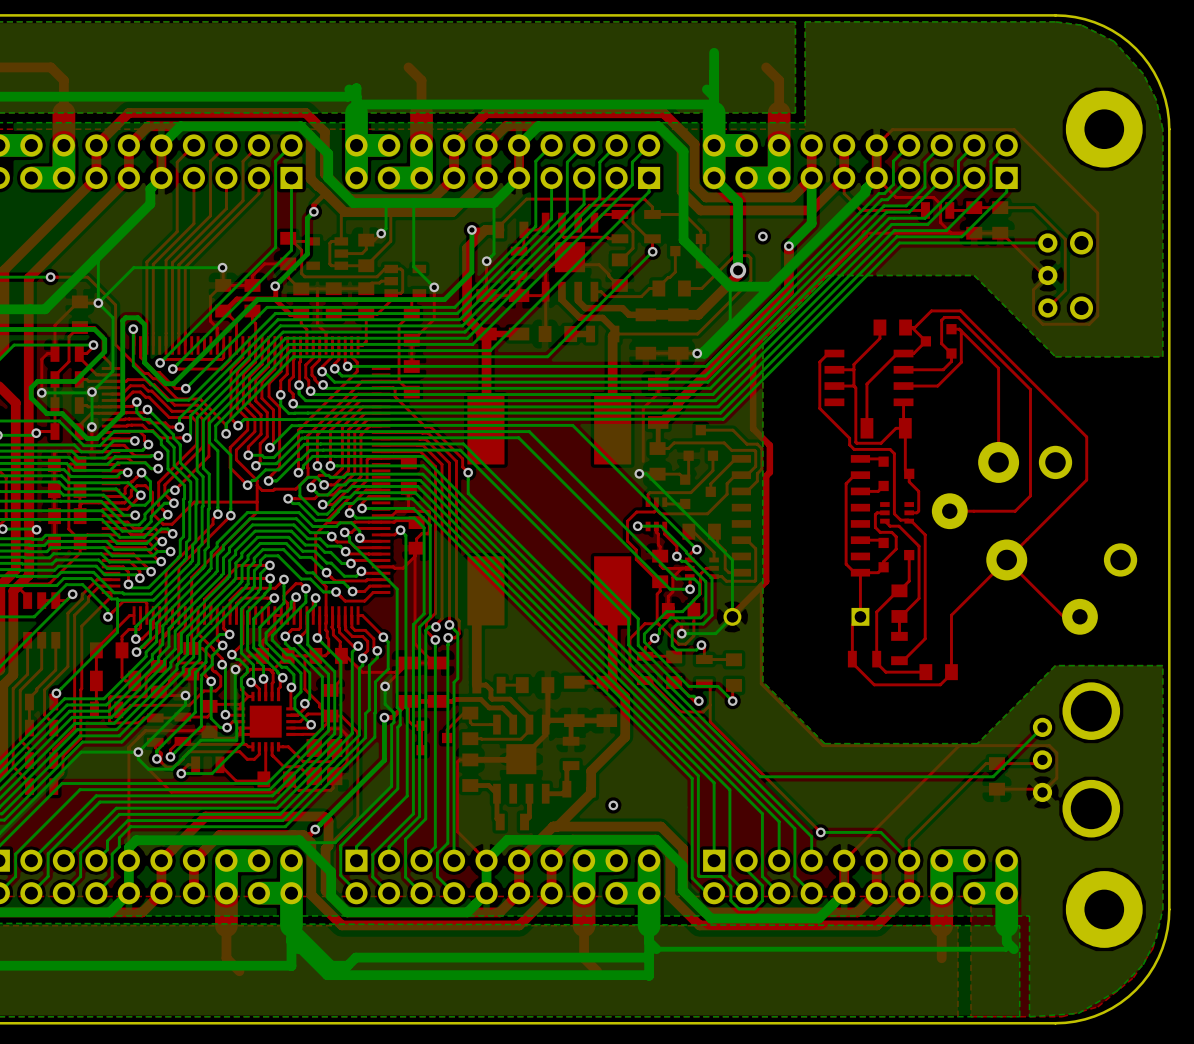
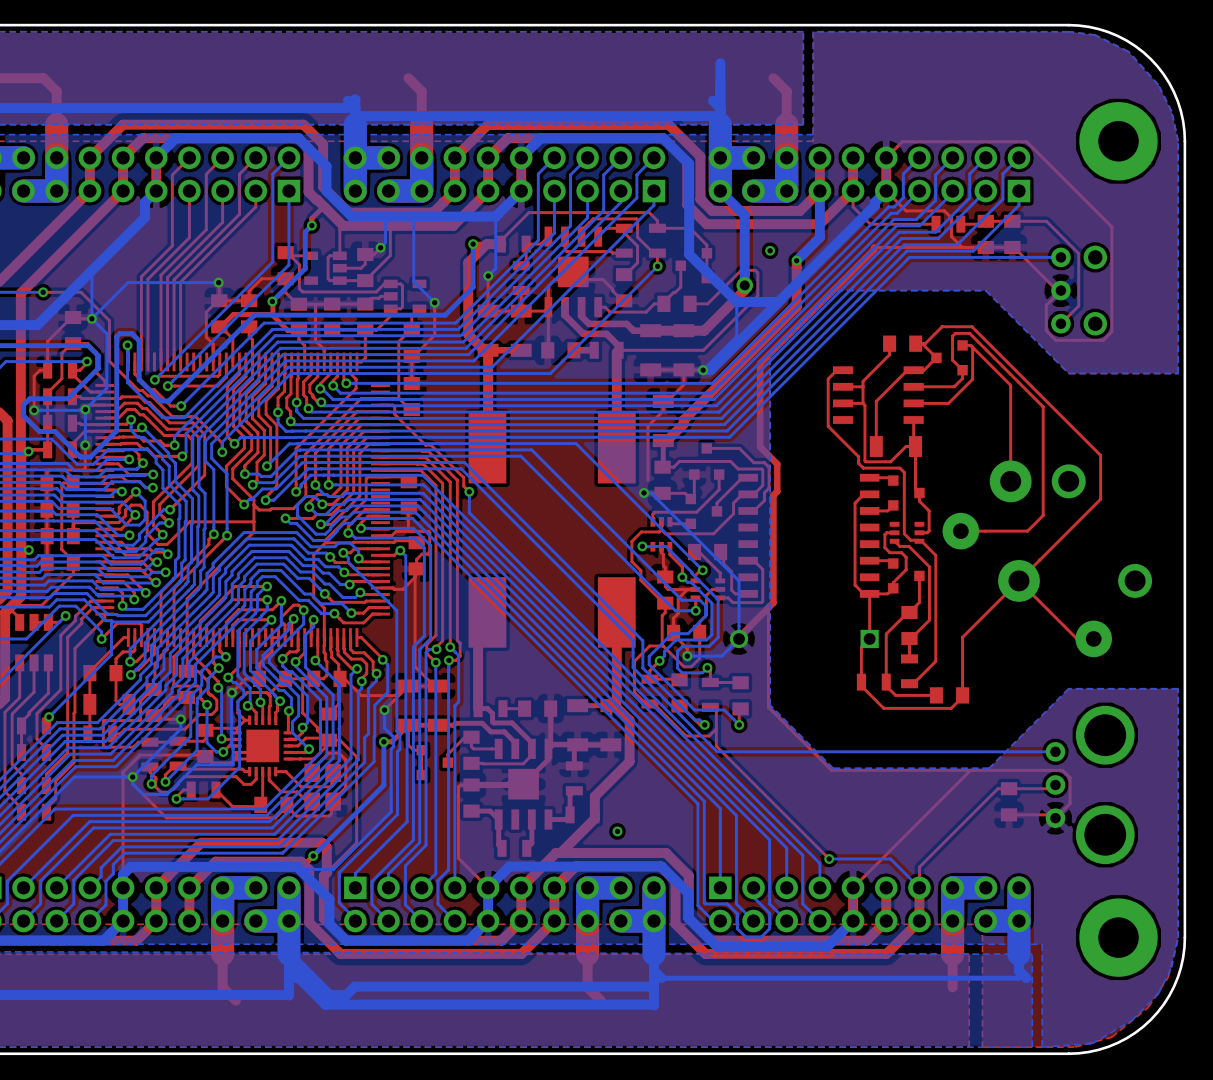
bottom track: (1042, 727) (993, 776) (760, 776) (711, 727) -> (1055, 751) (717, 751)

